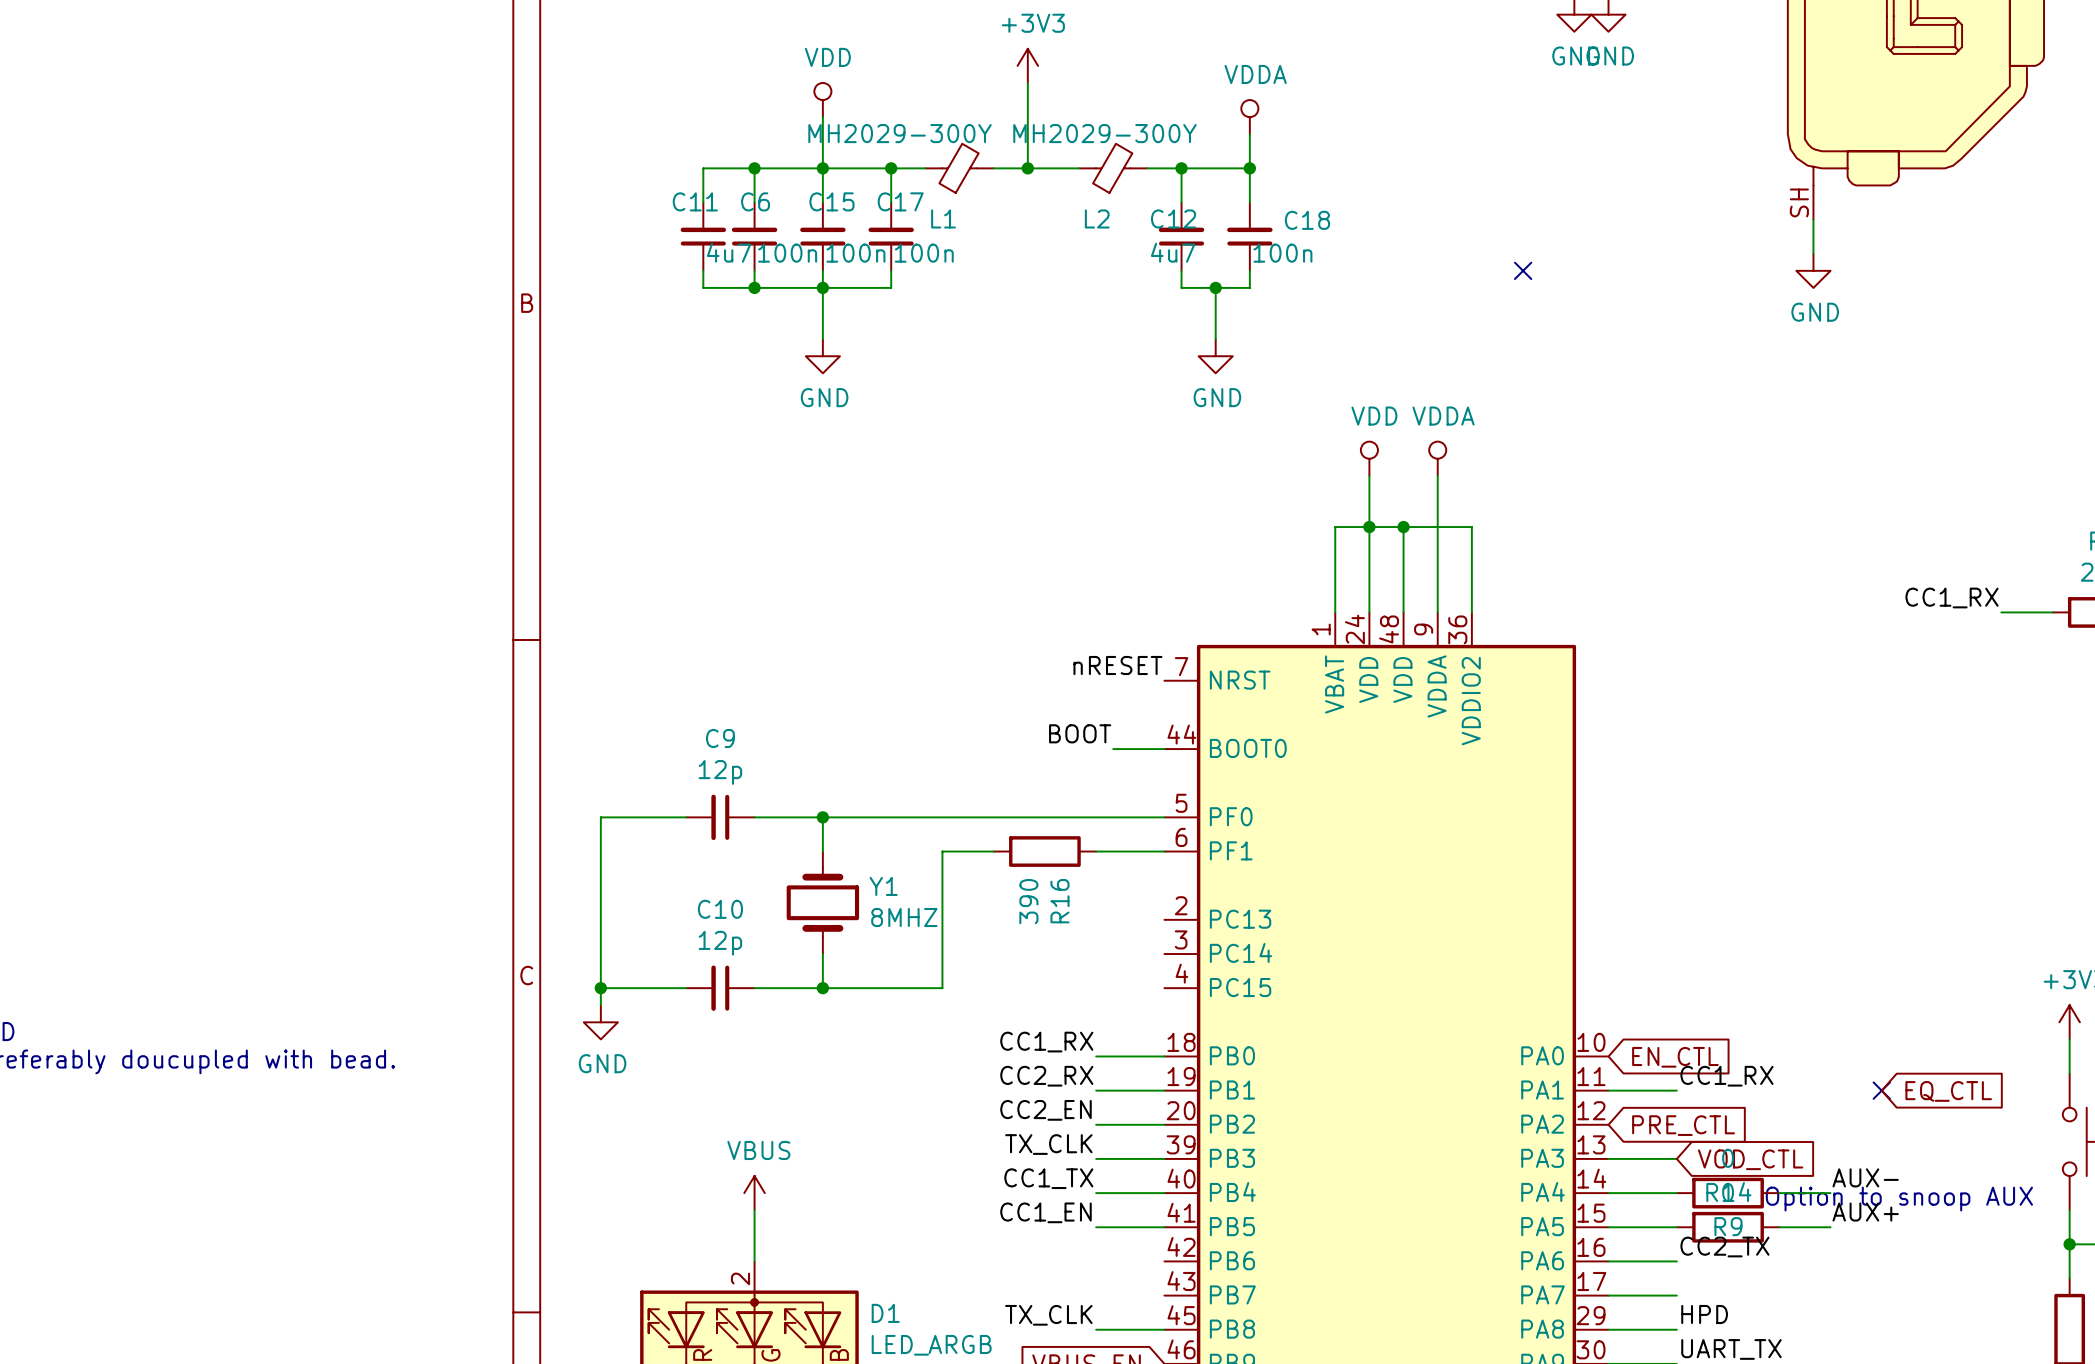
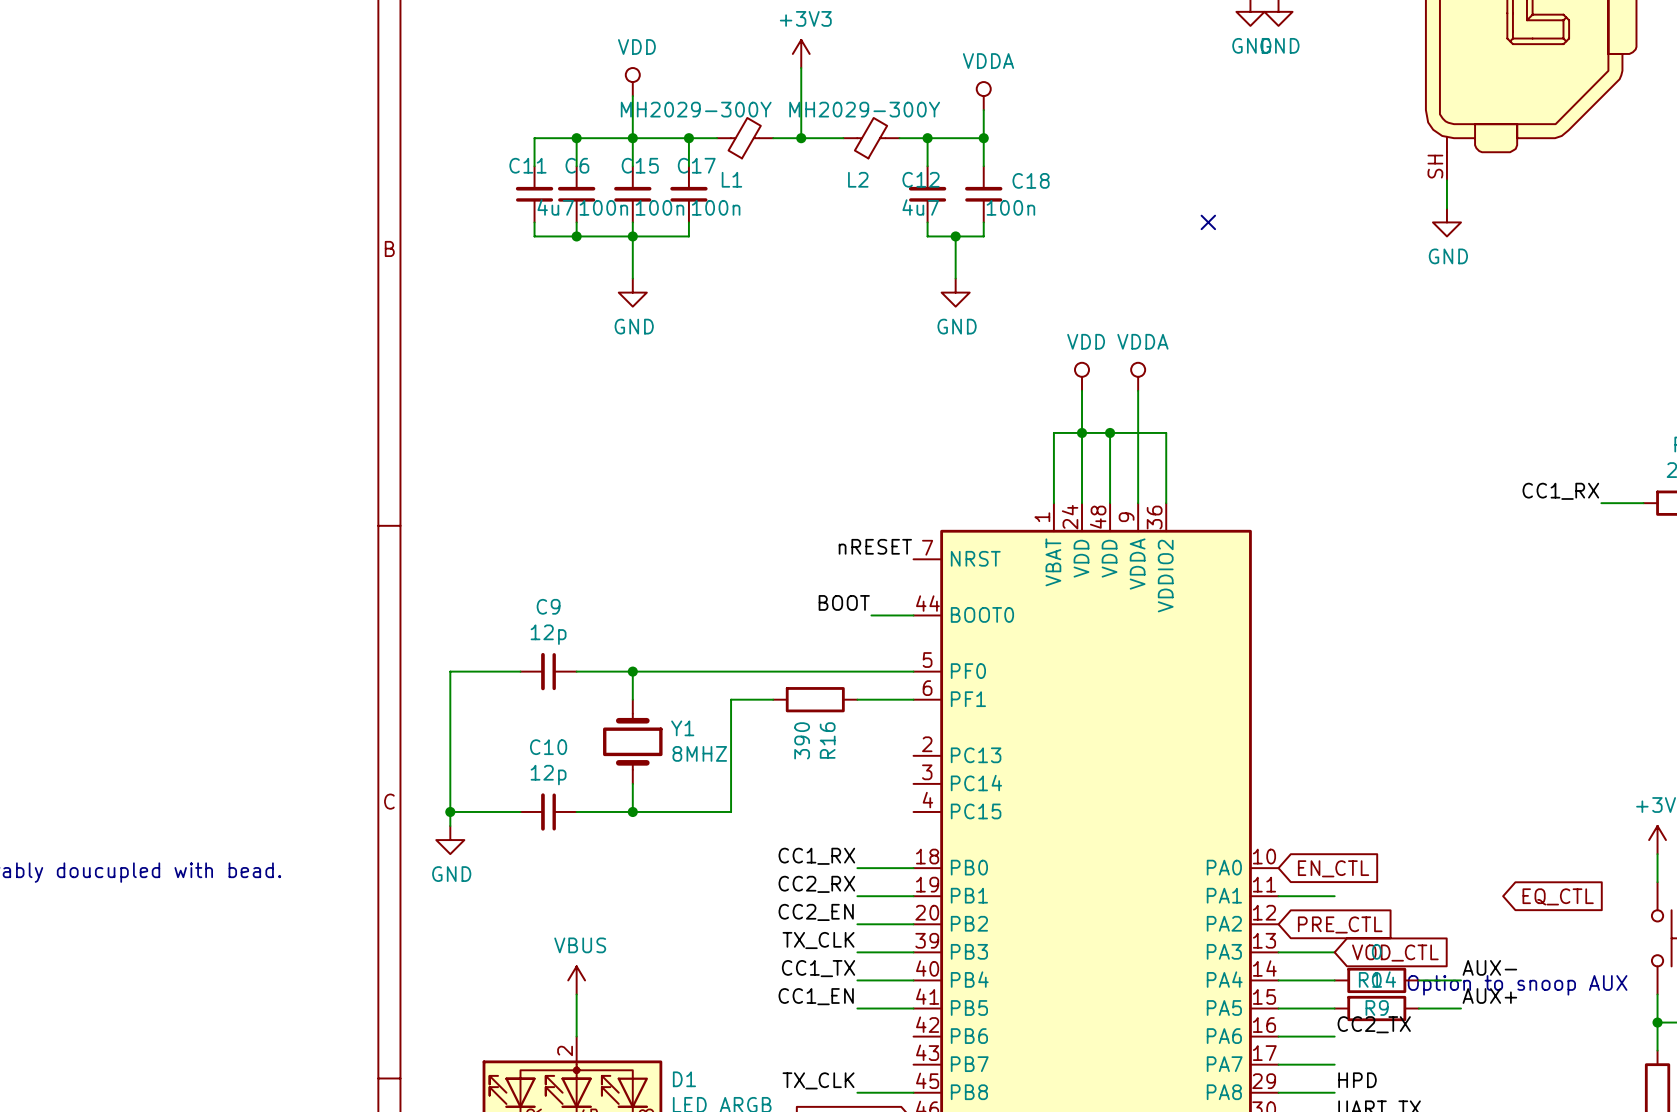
label: CC1_RX (1726, 1076) -> none
no-connect mark: (1881, 1090) -> none

